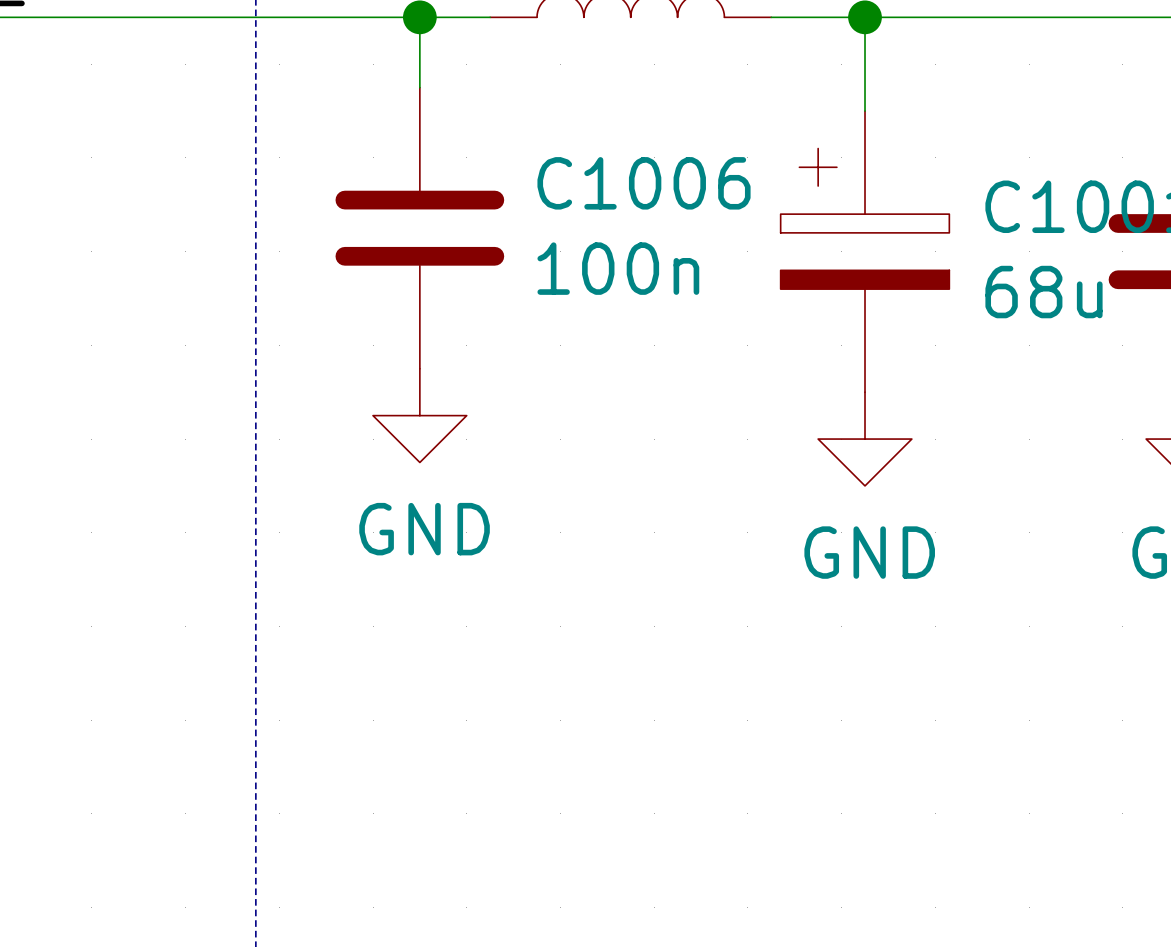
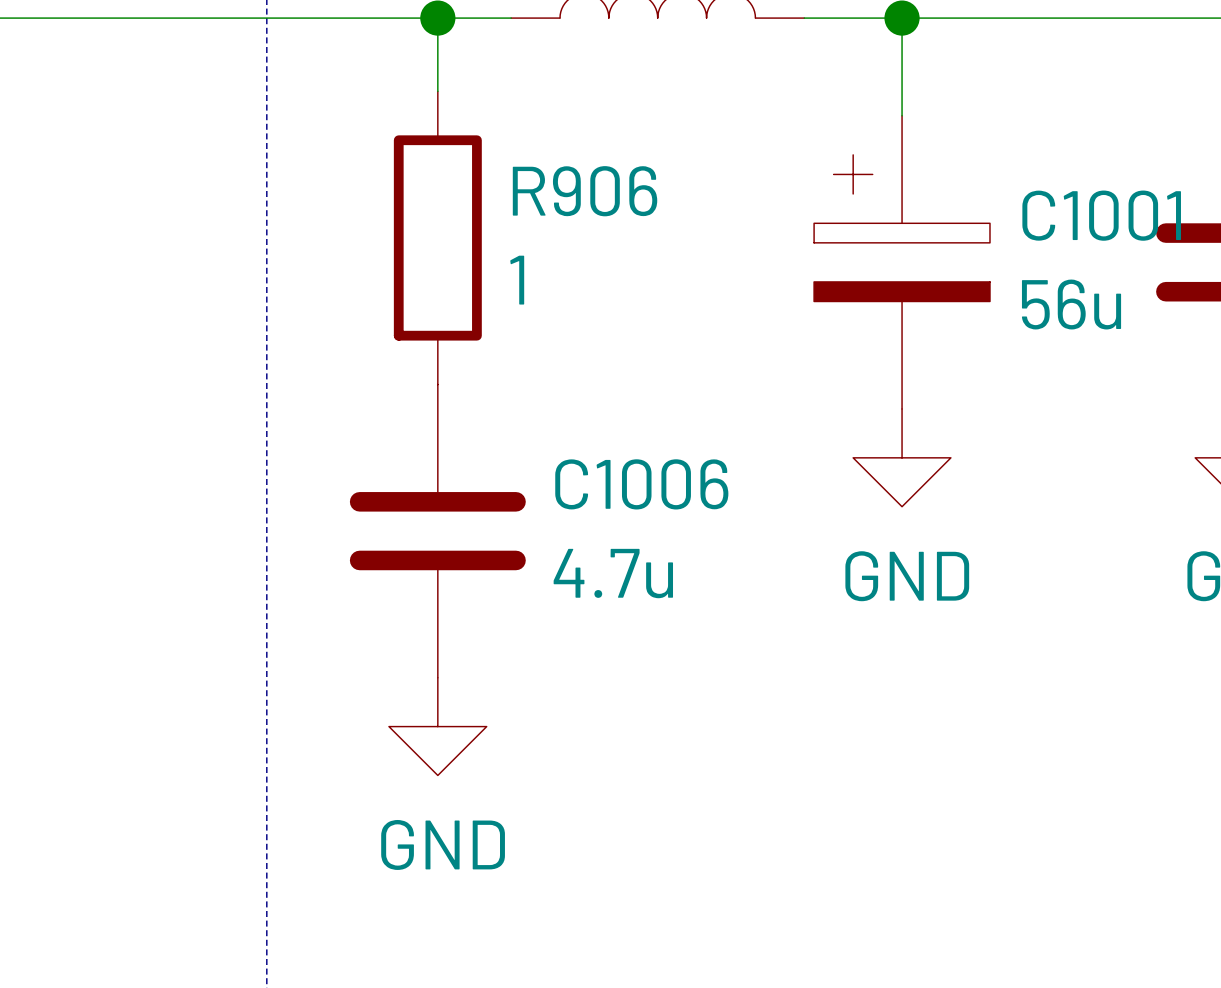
C1006 position: (419, 228) -> (437, 531)
R906: none -> 1 (437, 237)
C1006 value: 100n (618, 268) -> 4.7u (613, 573)
C1001 value: 68u (1043, 292) -> 56u (1071, 304)
power symbol position: GND (419, 415) -> GND (437, 726)

